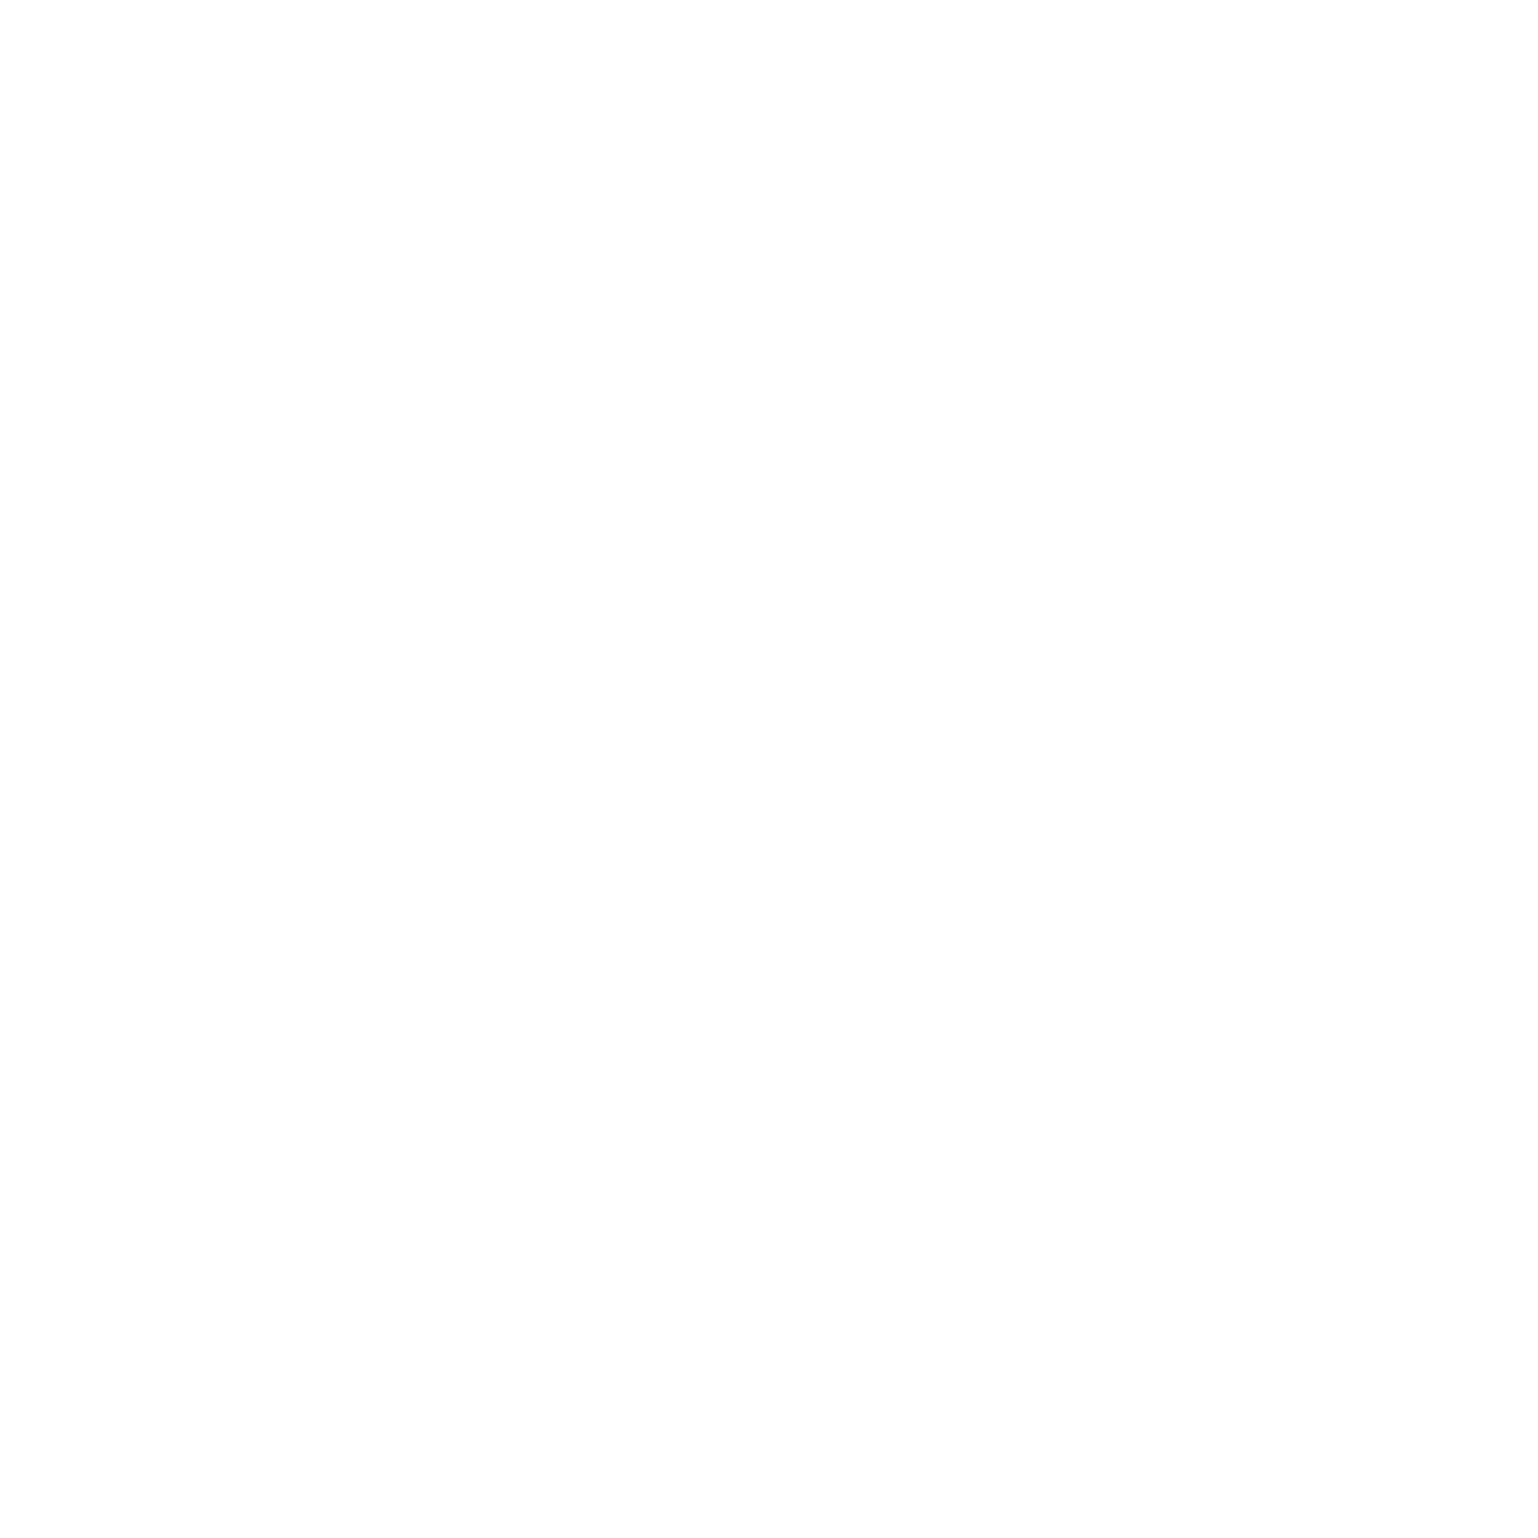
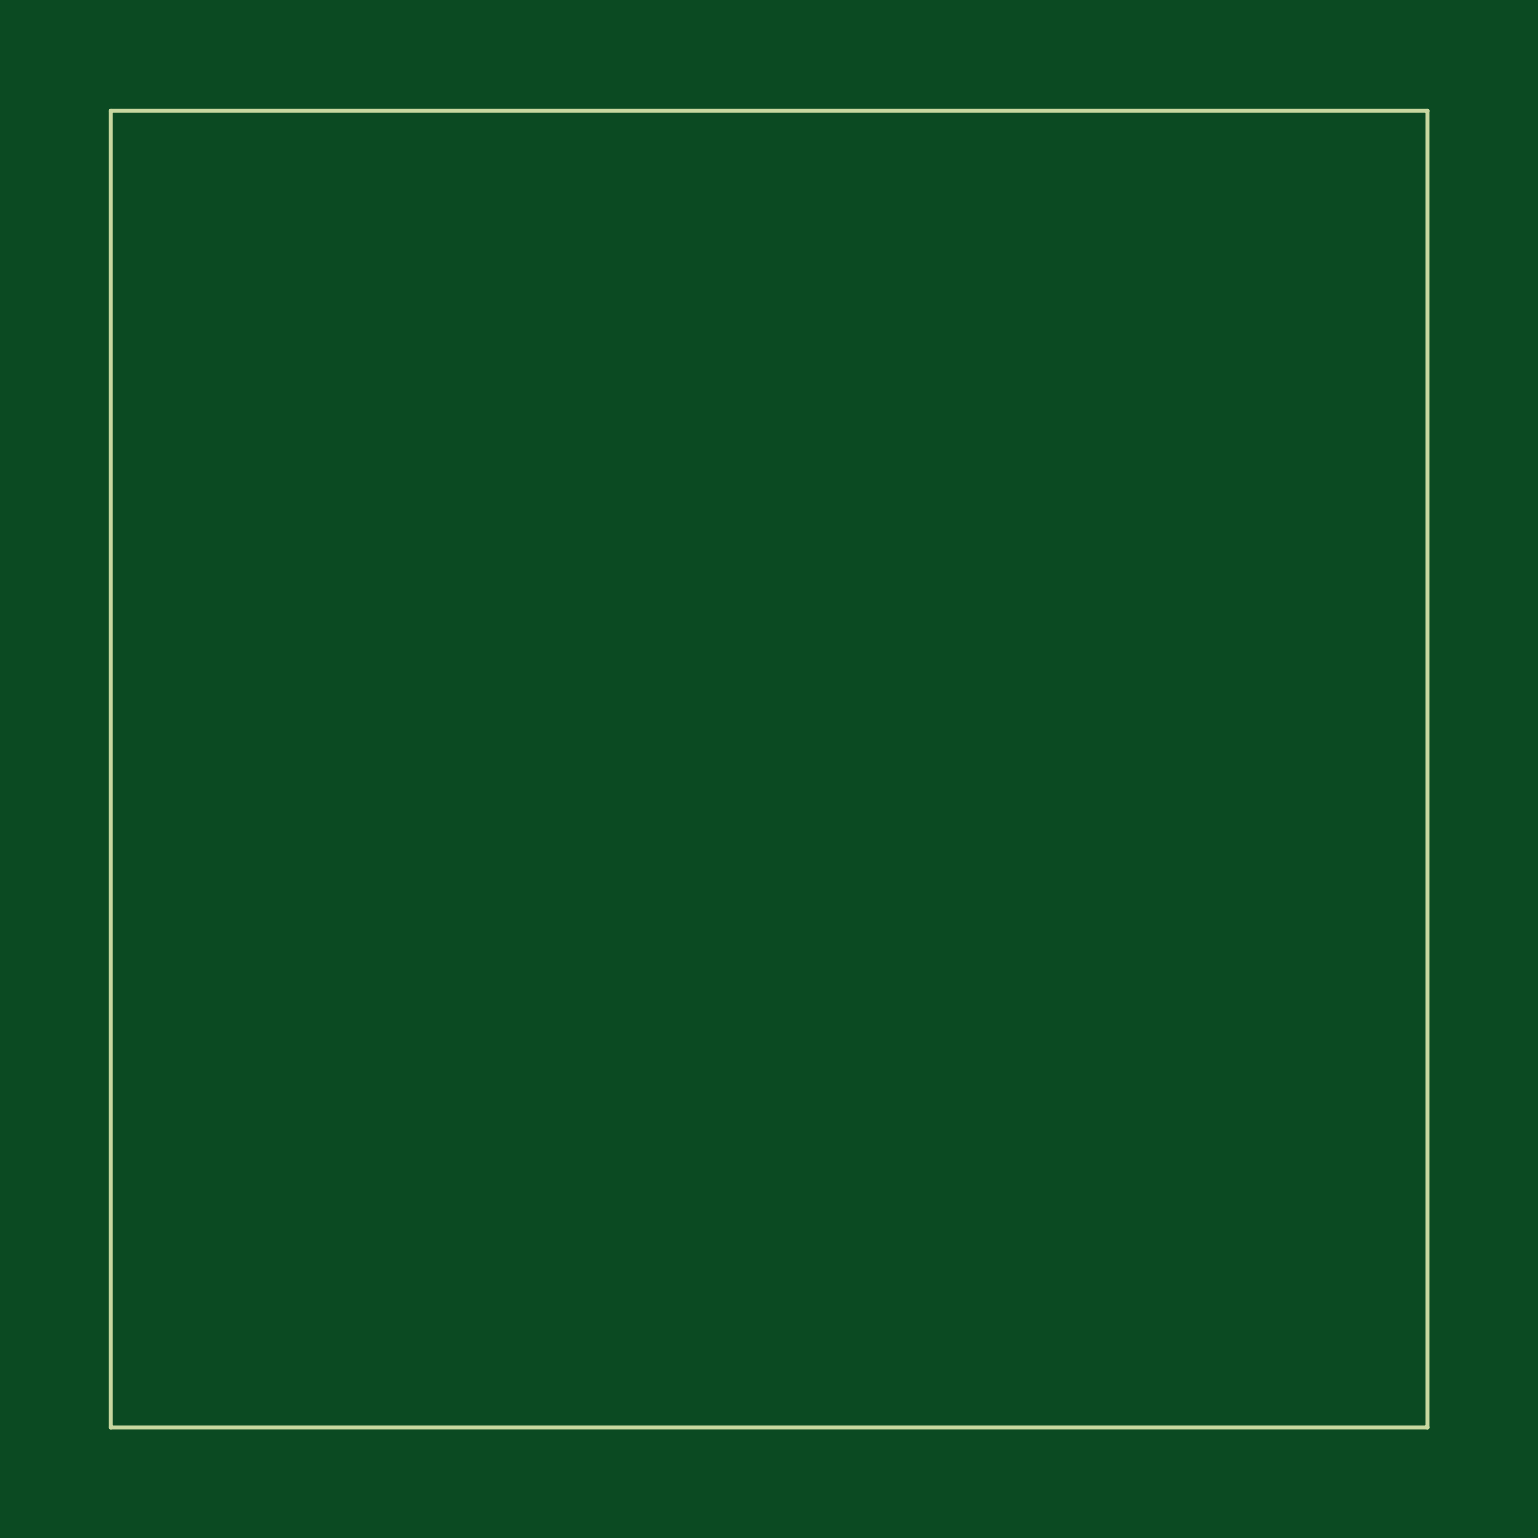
board edge: none -> (110, 110) (1427, 110) (1427, 1427) (110, 1427) (110, 110)

